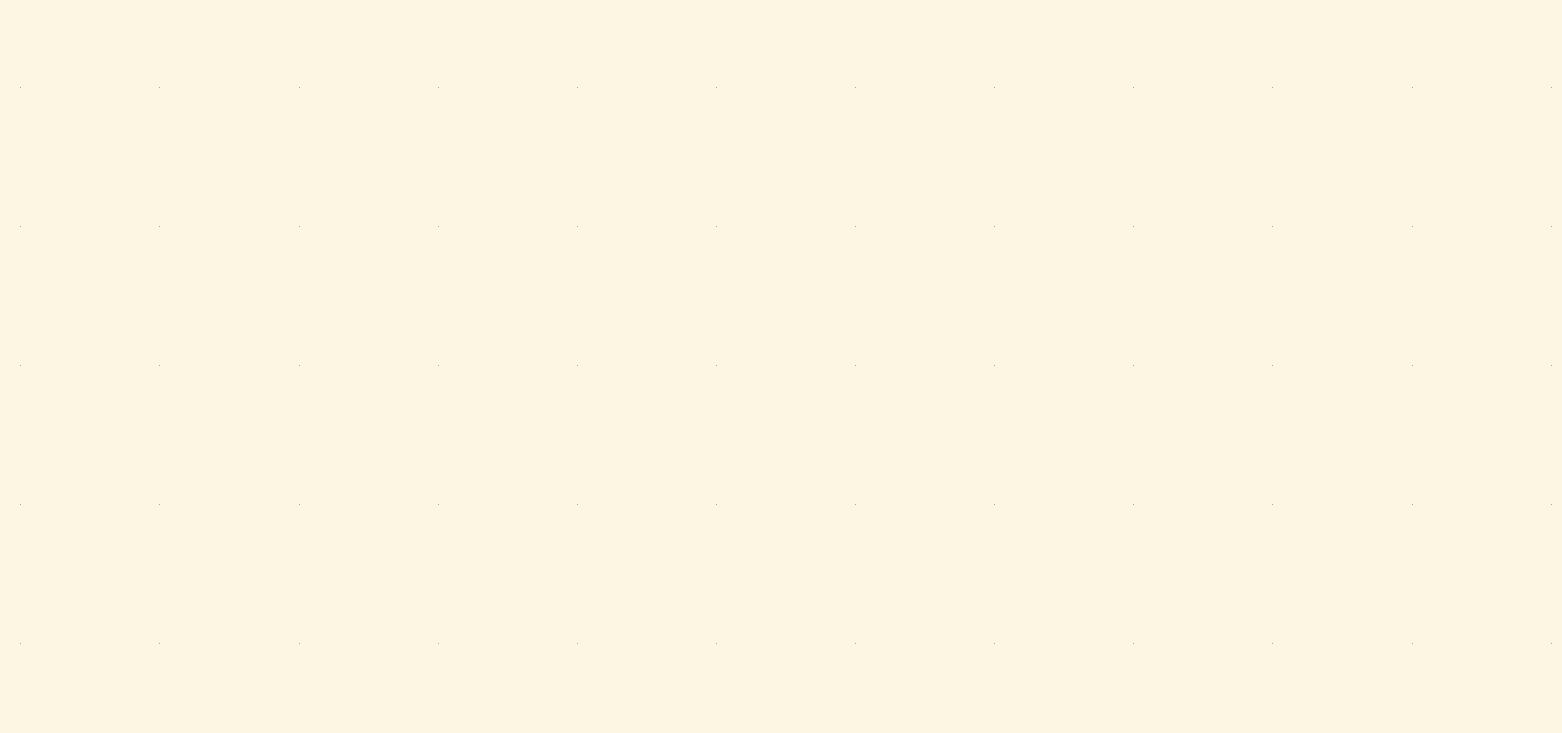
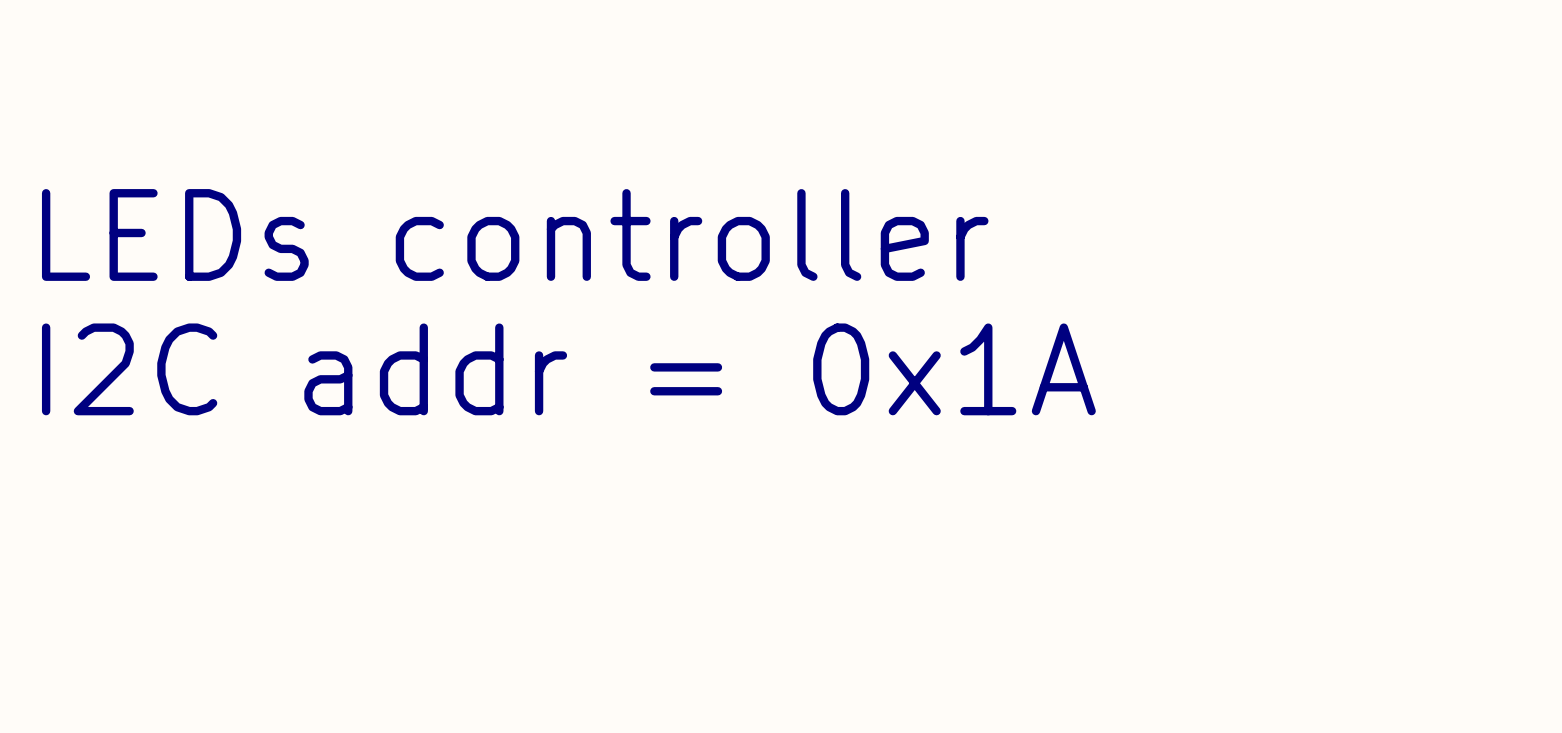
text: none -> LEDs controller (515, 234)
text: none -> I2C addr = 0x1A (568, 369)

